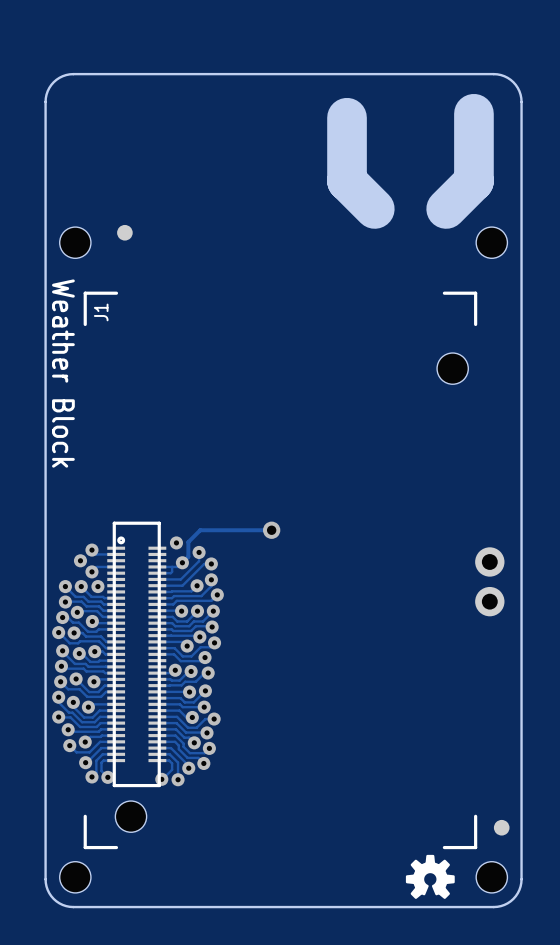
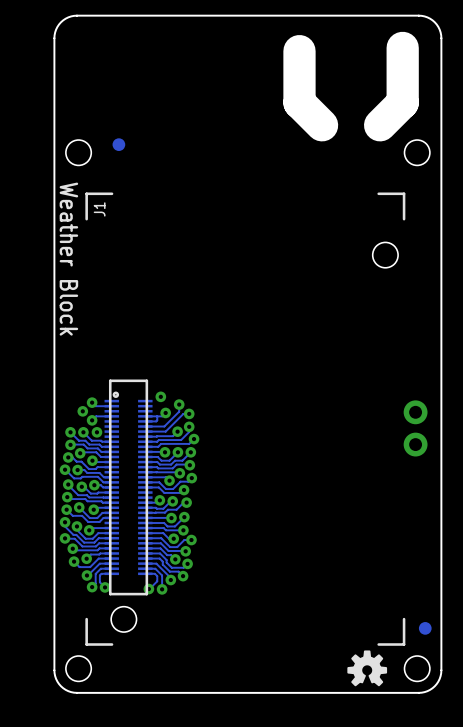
track: (271, 530) (200, 530) (188, 542) (188, 556) (182, 562) -> none
via: (271, 530) -> none

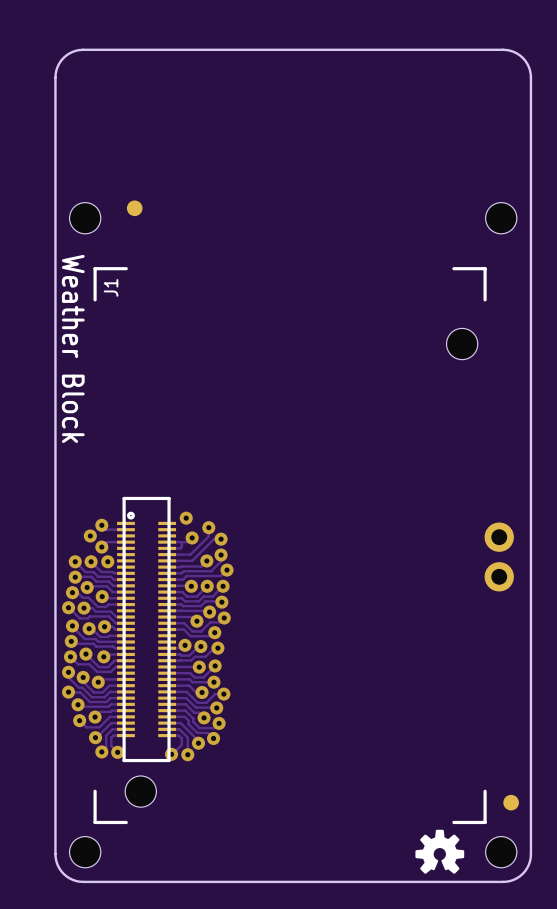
board edge: (402, 47) (402, 102) (380, 125) -> none
board edge: (299, 51) (299, 102) (322, 125) -> none

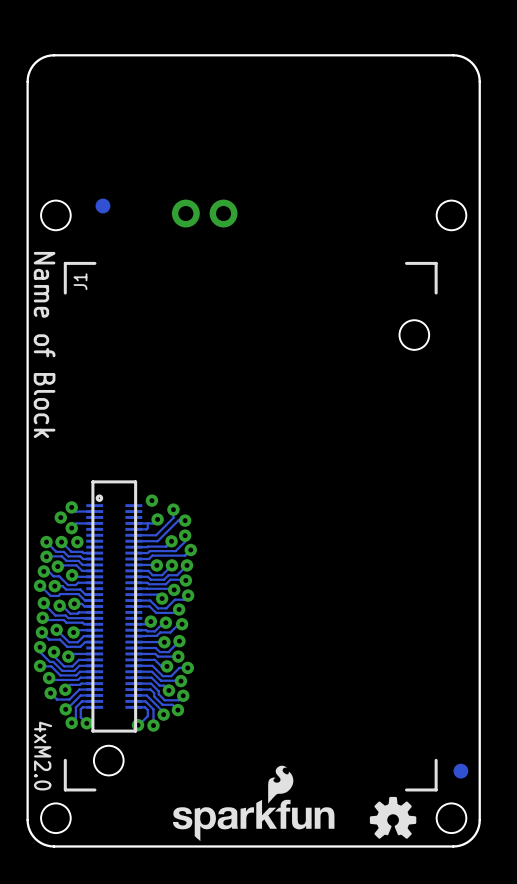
part: none -> (204, 213)
text: Weather Block (73, 348) -> Name of Block (44, 344)
part: (499, 556) -> none
text: none -> 4xM2.0 (43, 756)
drawing: none -> [172, 765, 335, 842]

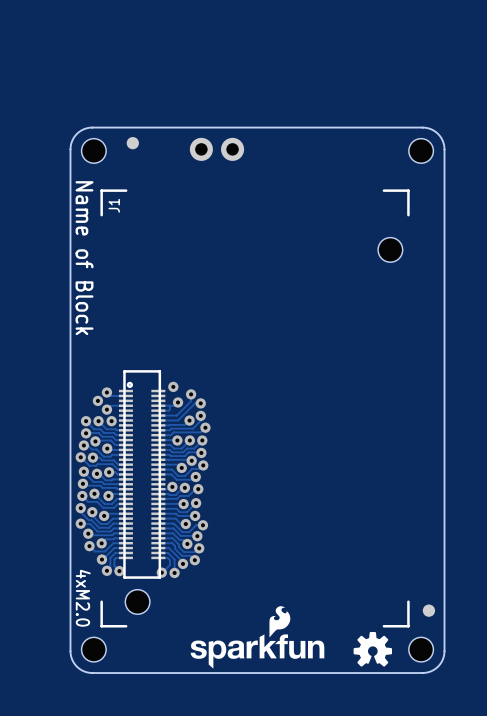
board edge: (479, 213) (479, 78) (476, 68) (469, 60) (453, 55) (54, 55) (43, 57) (33, 65) (27, 78) (27, 213) -> (444, 149) (442, 141) (438, 133) (431, 129) (422, 127) (92, 127) (83, 129) (76, 133) (72, 141) (70, 149)

